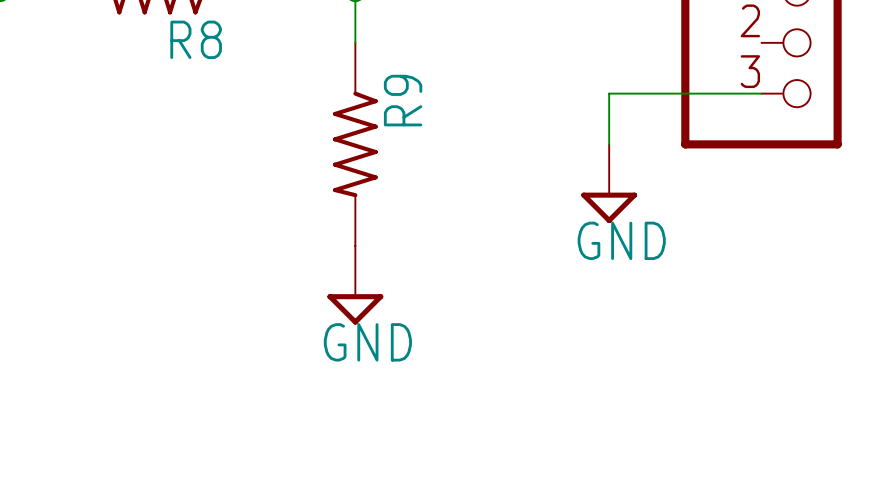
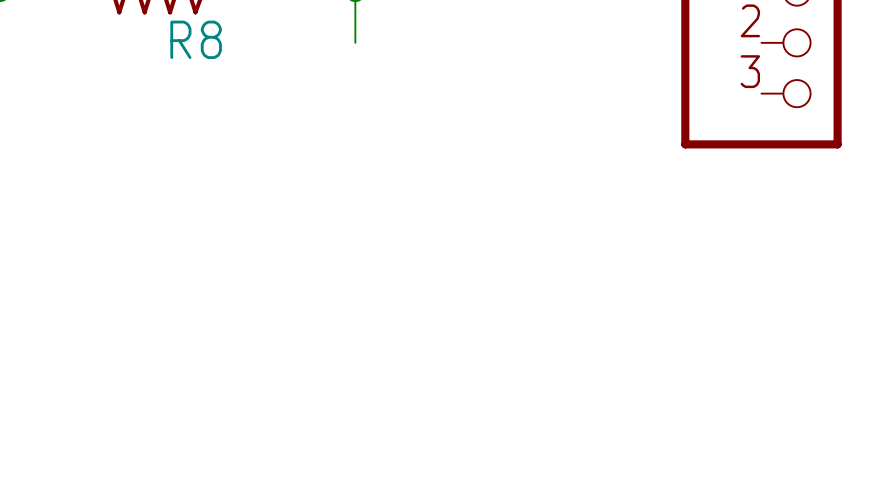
wire: (761, 93) (609, 93) (609, 144) -> none
R9: (355, 144) -> none
power symbol: GND (609, 183) -> none
power symbol: GND (355, 285) -> none

